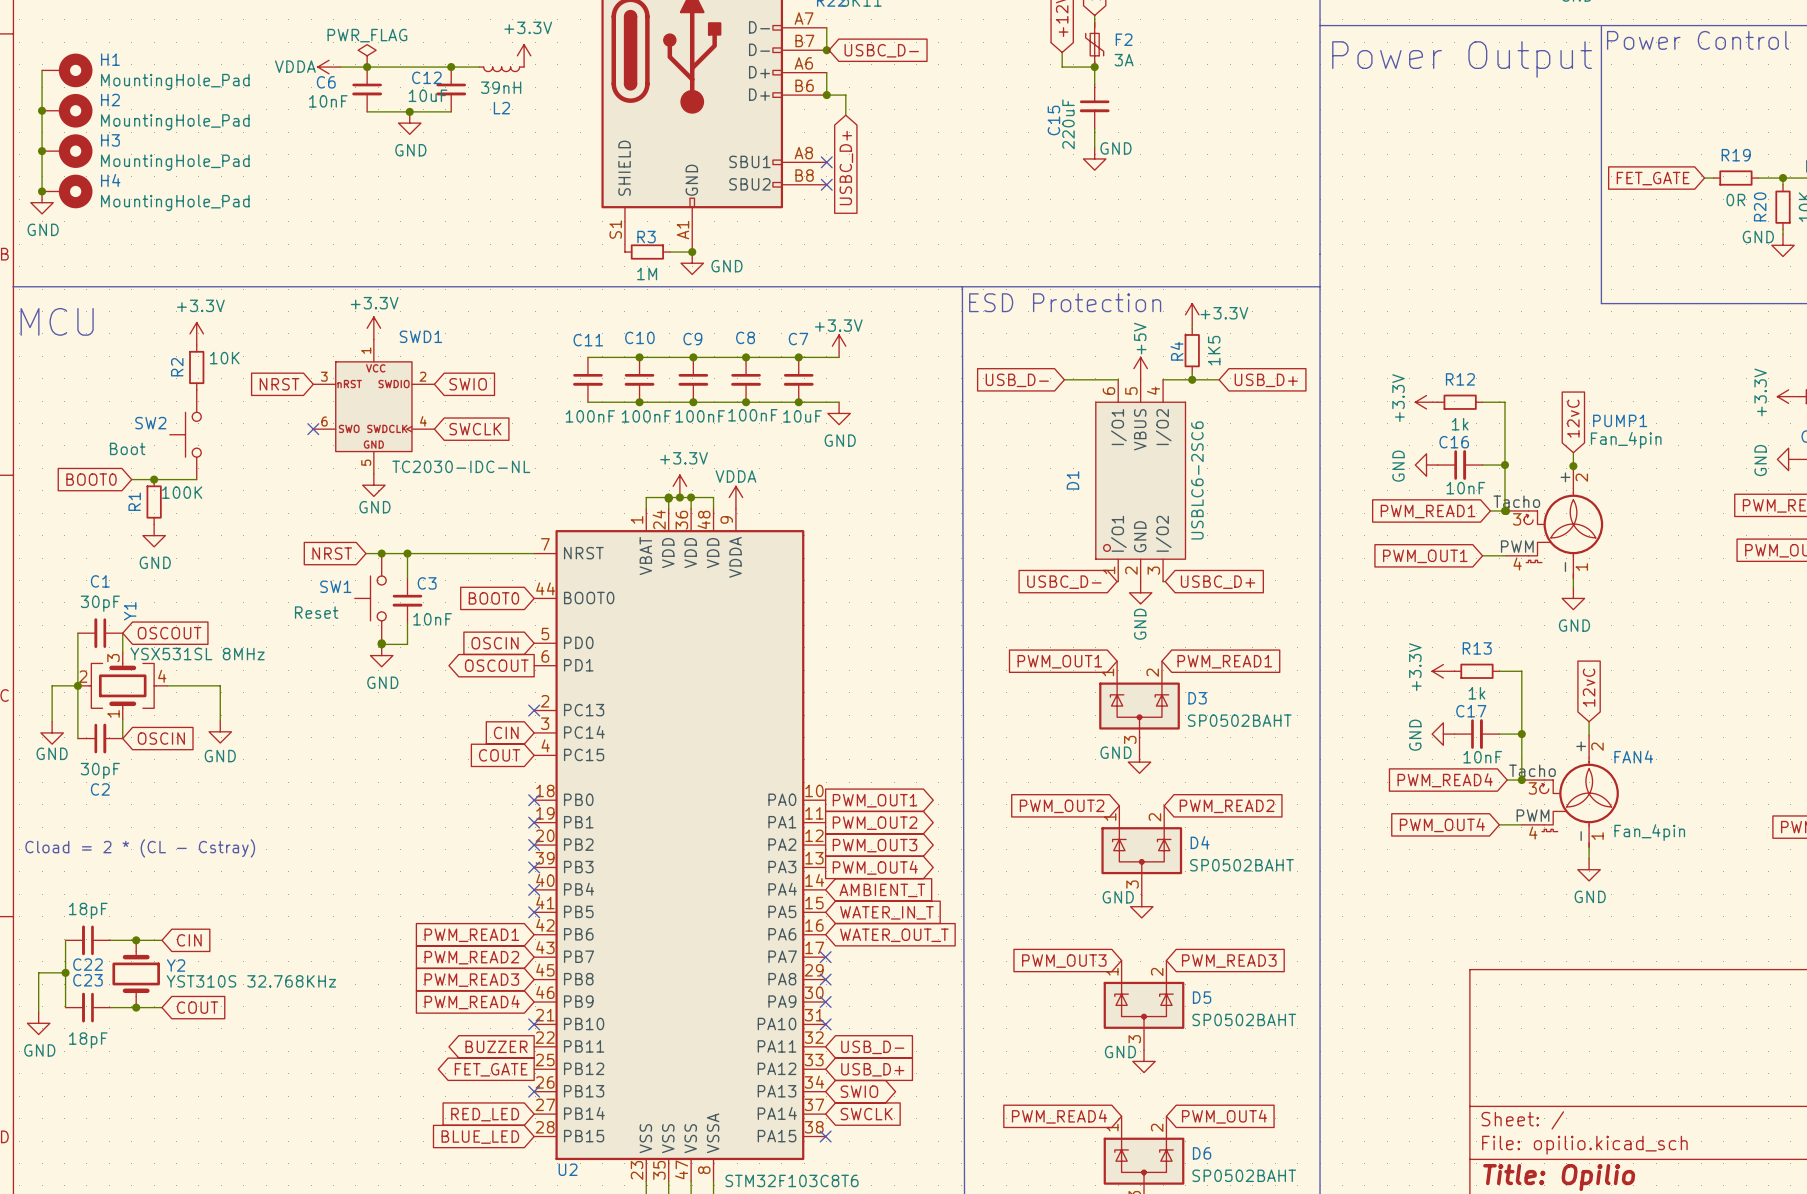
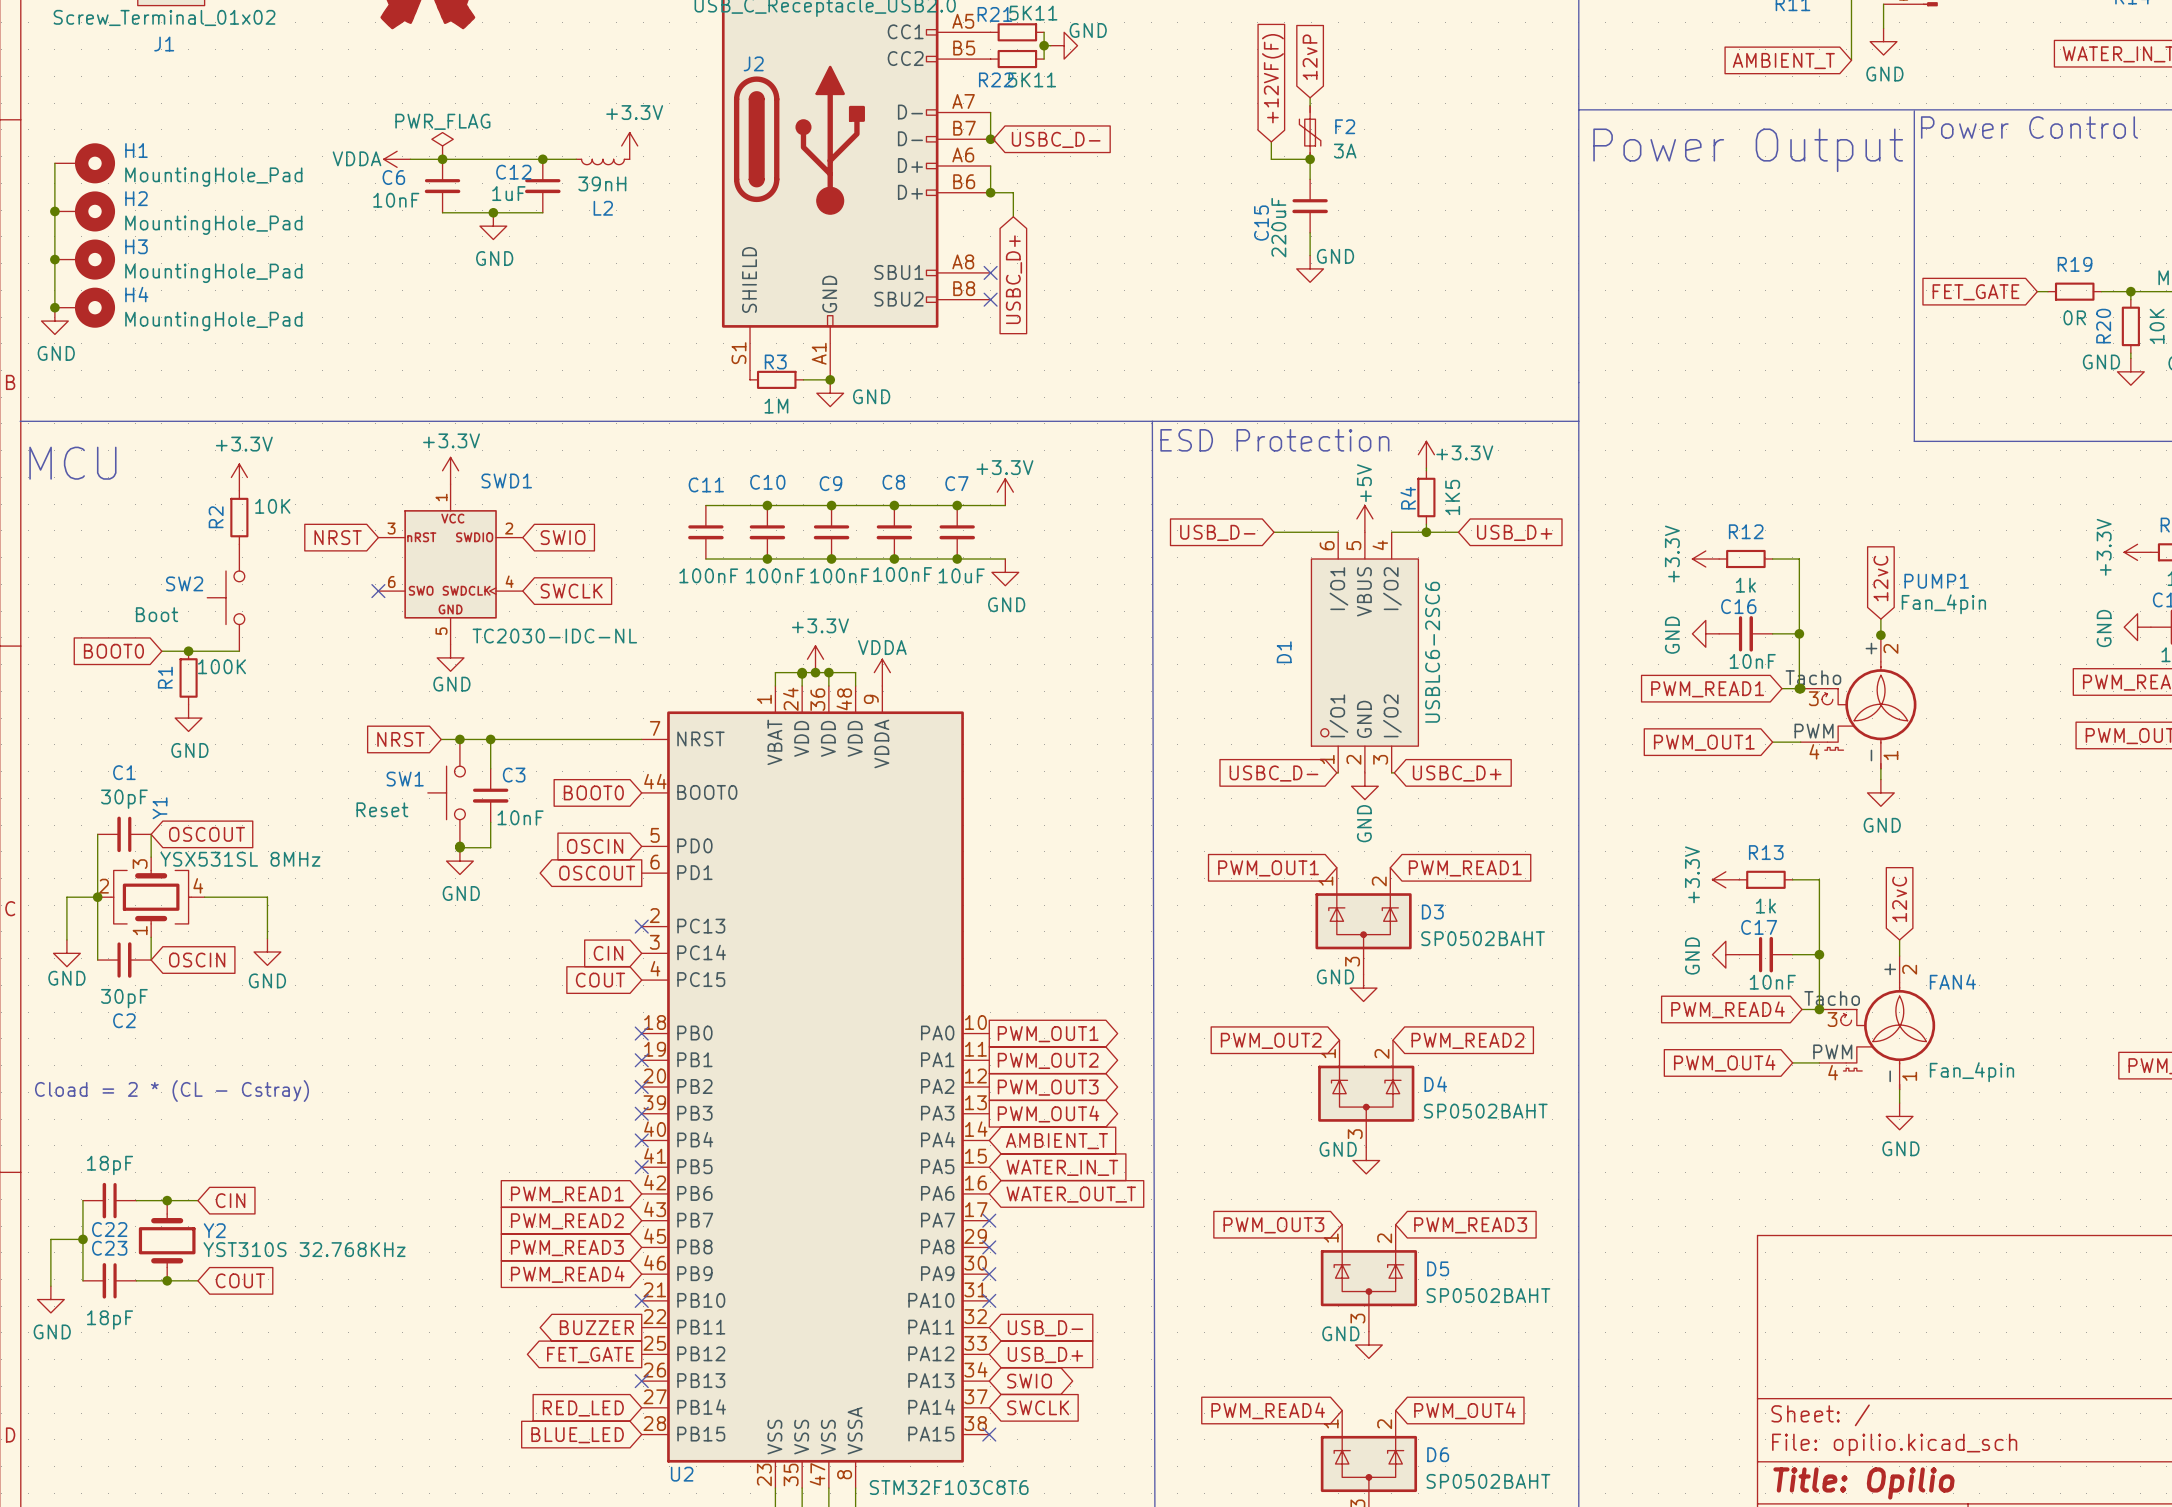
C12 value: 10uF (428, 95) -> 1uF (508, 193)

